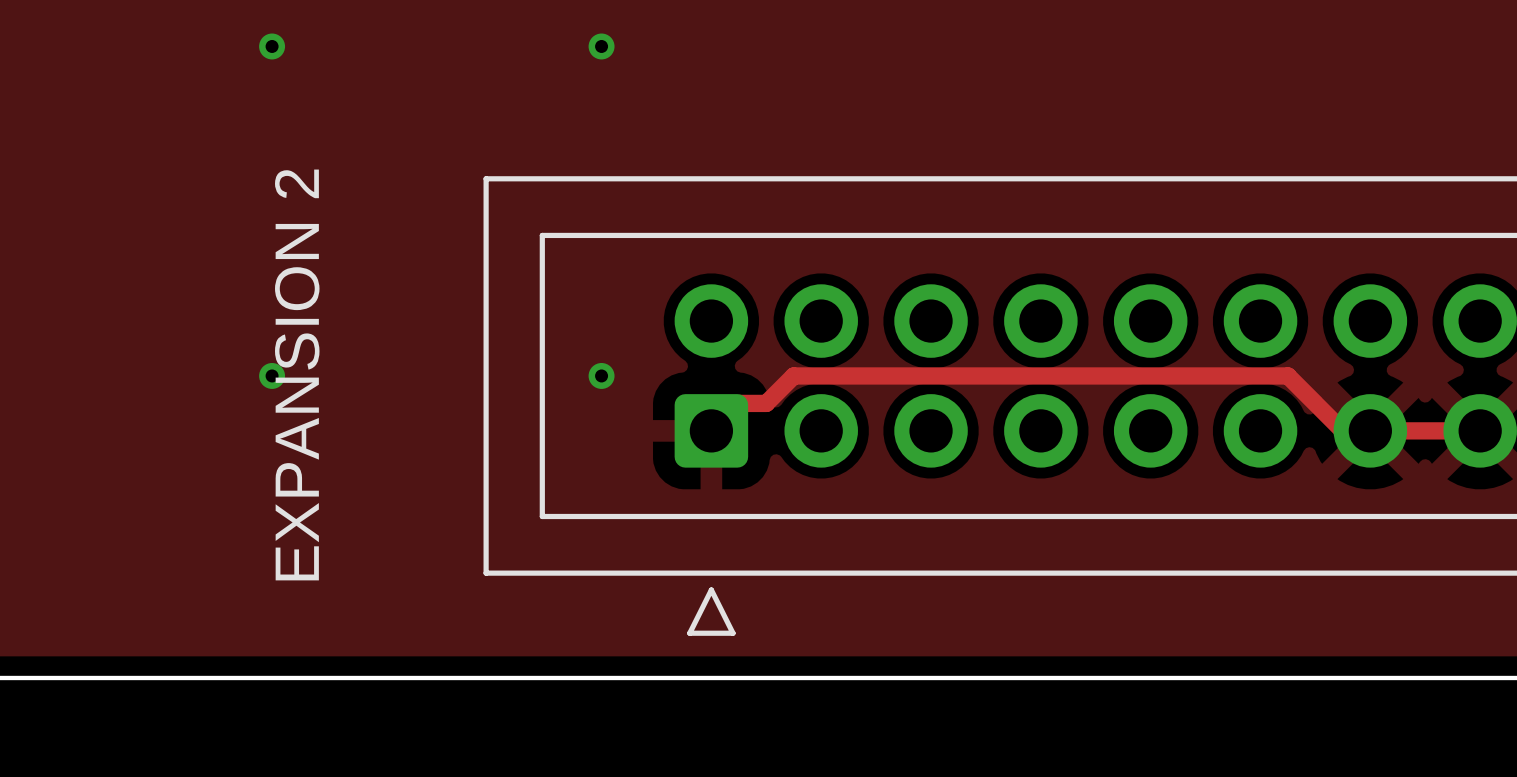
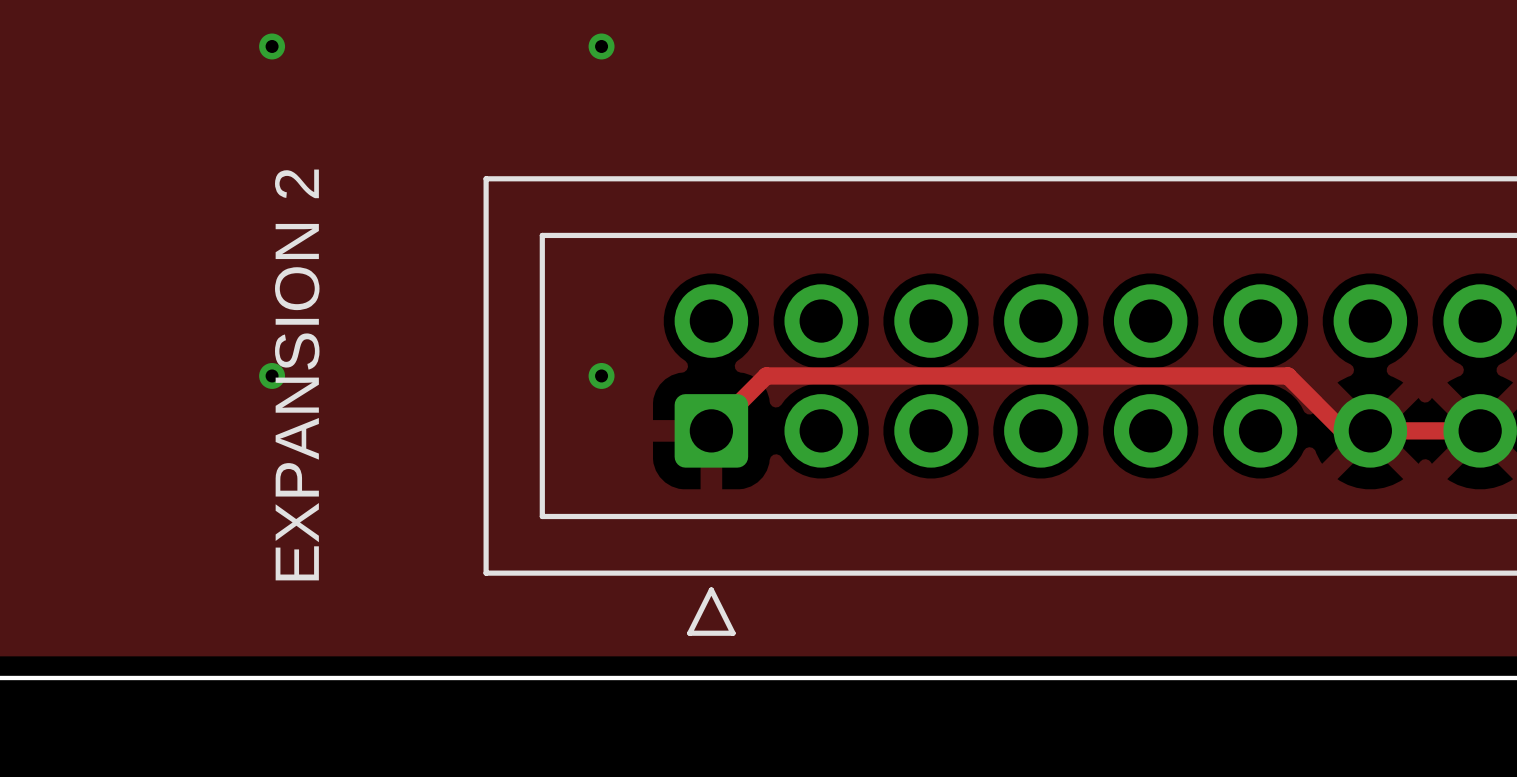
track: (793, 375) (766, 403) (738, 403) -> (793, 375) (766, 375) (738, 403)

